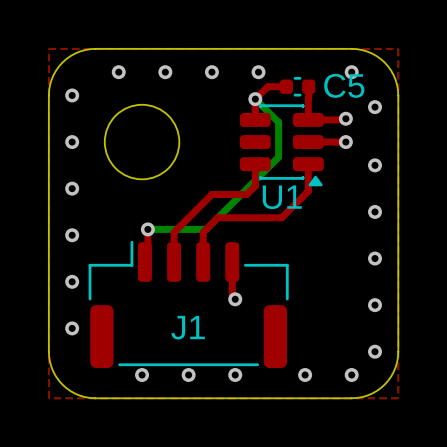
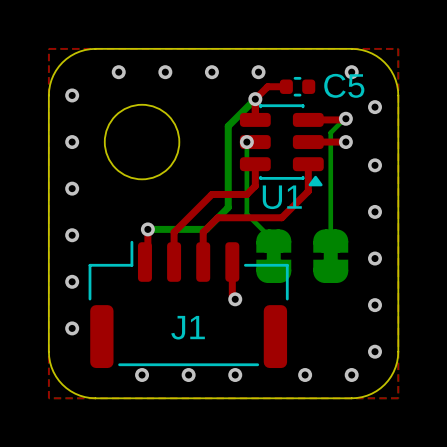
top track: (308, 86) (308, 119) -> none
bottom track: (255, 99) (278, 122) (278, 157) (228, 207) -> (255, 99) (228, 126) (228, 207)
bottom track: none -> (342, 121) (330, 132) (330, 241)
bottom track: none -> (246, 142) (246, 214) (273, 241)
via: none -> (246, 142)
part: none -> (273, 256)
part: none -> (330, 256)

